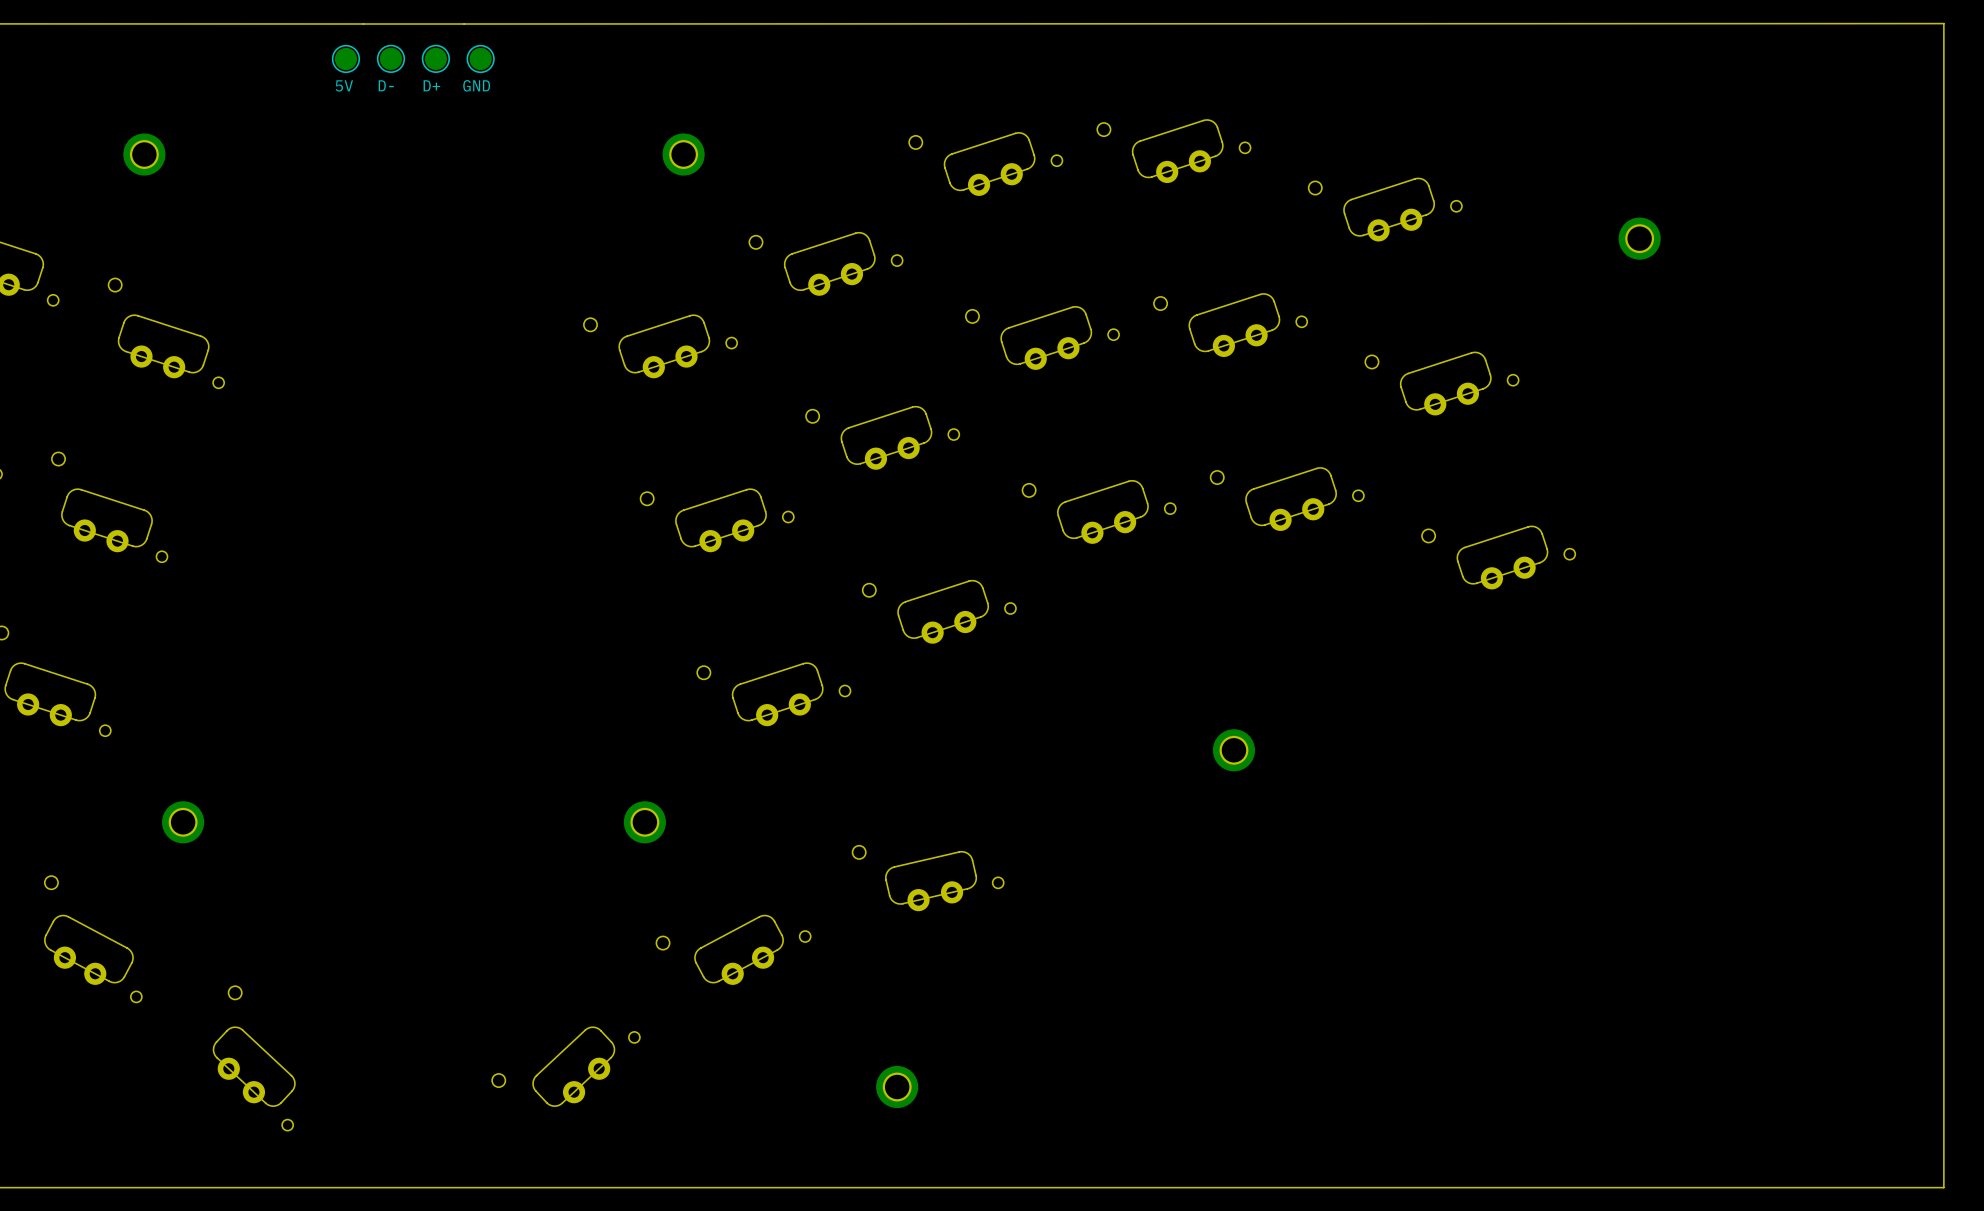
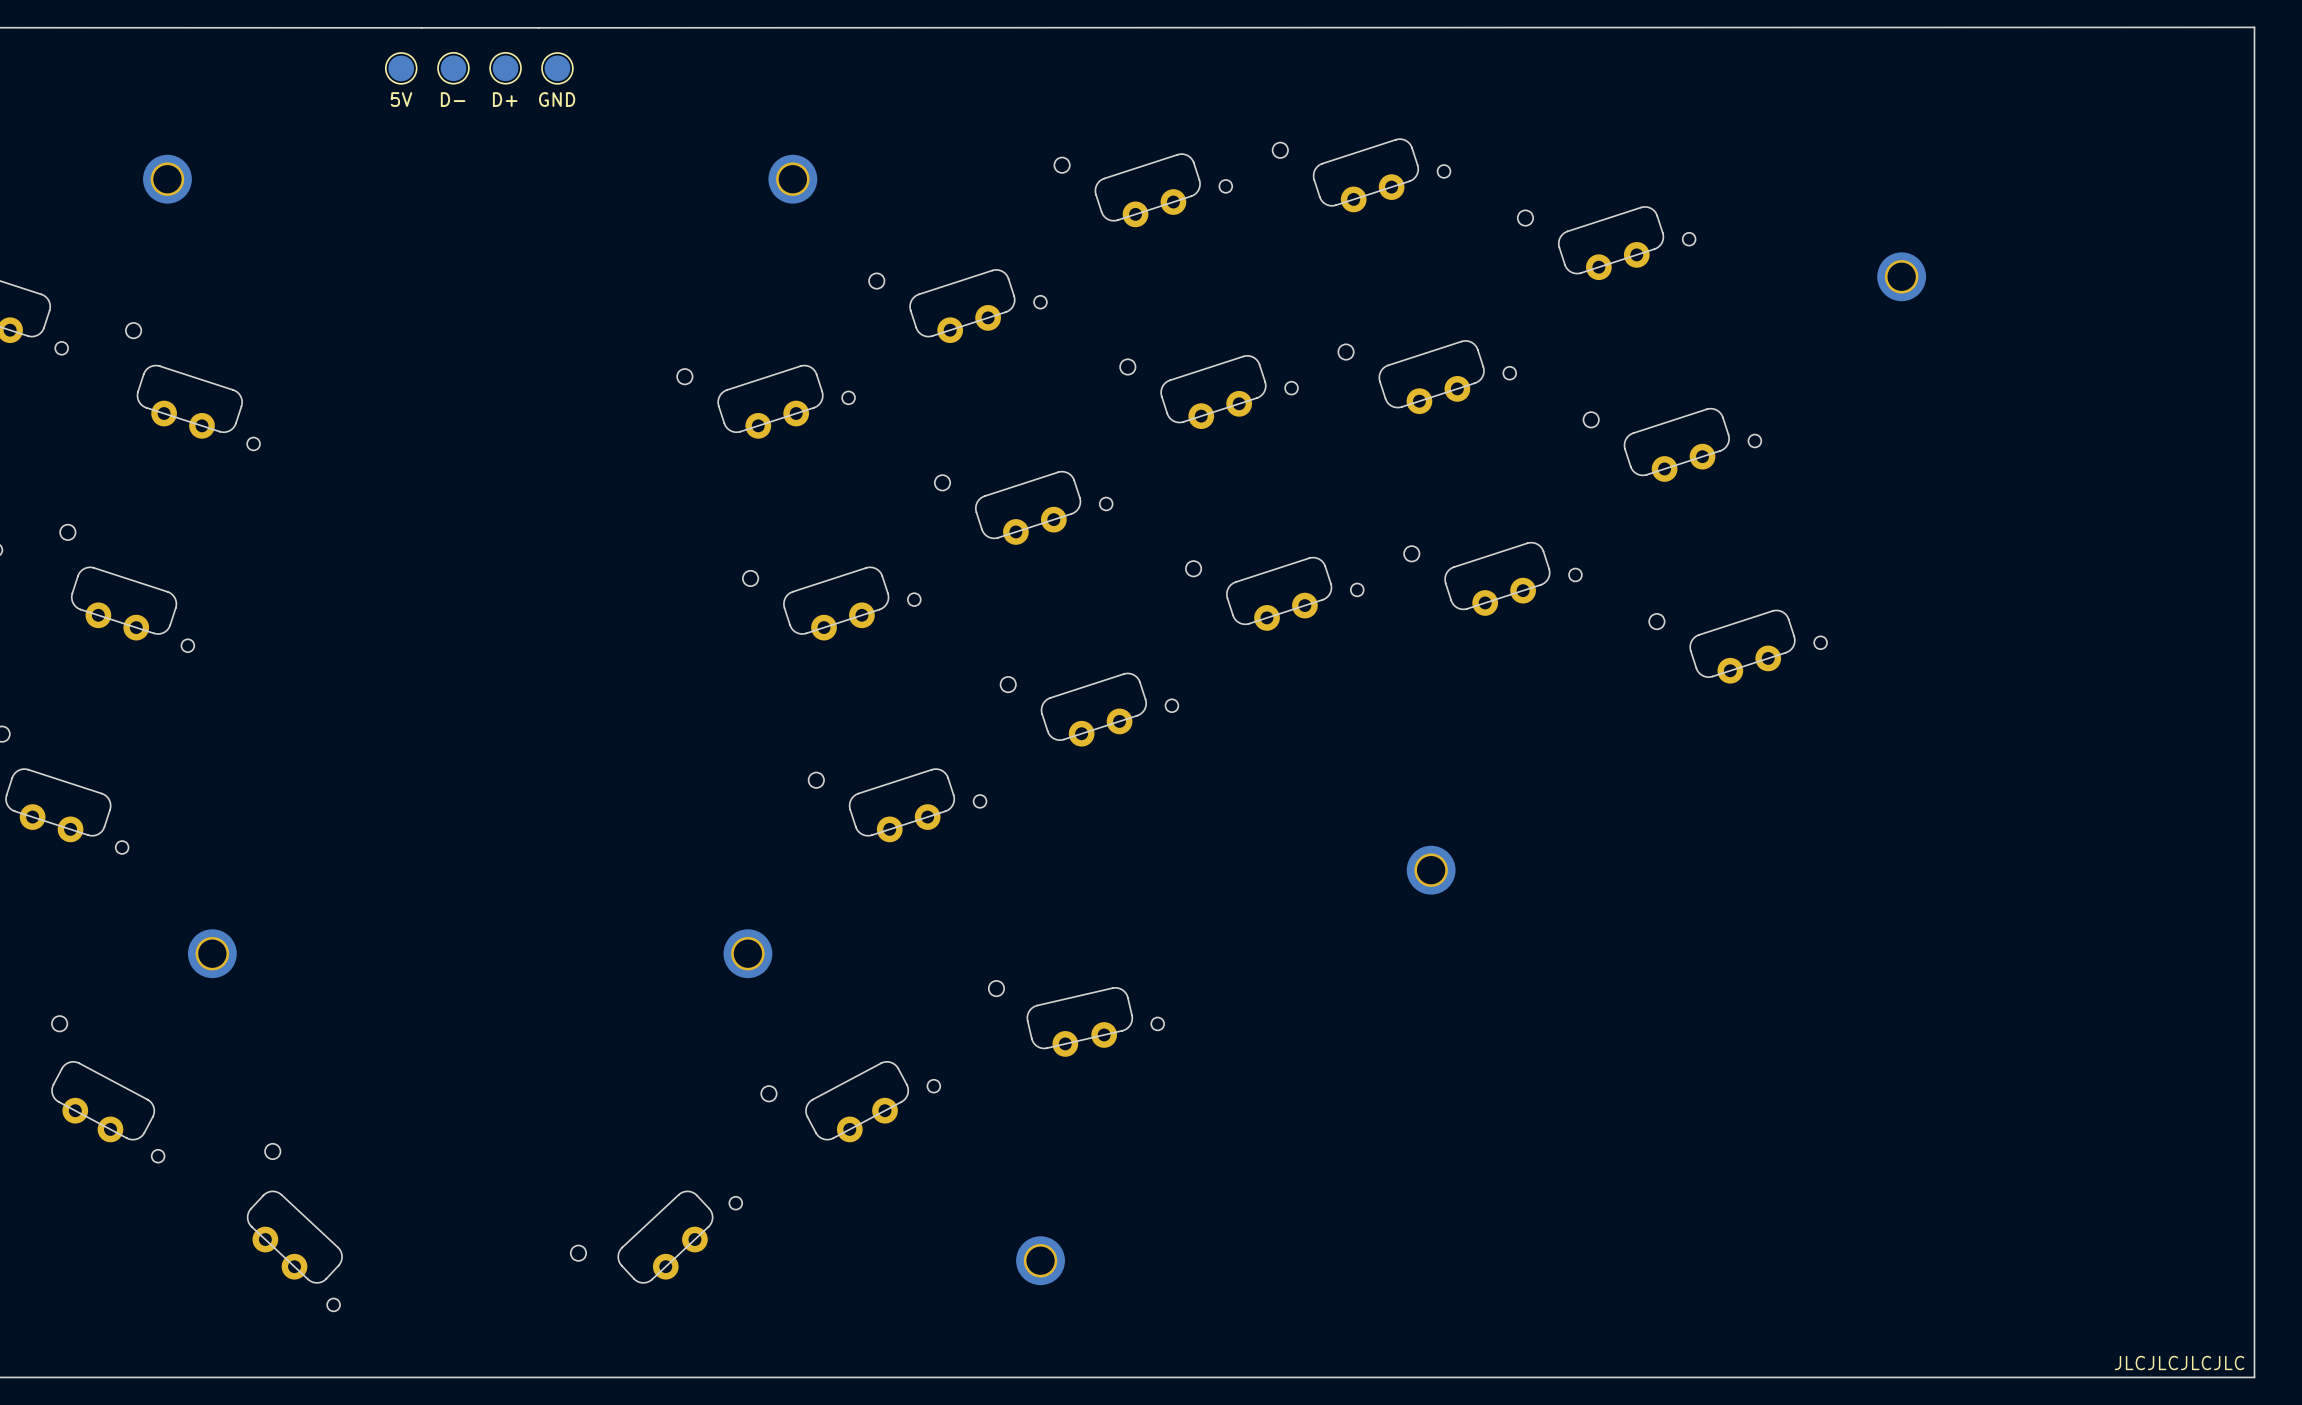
text: none -> JLCJLCJLCJLC (2179, 1363)

